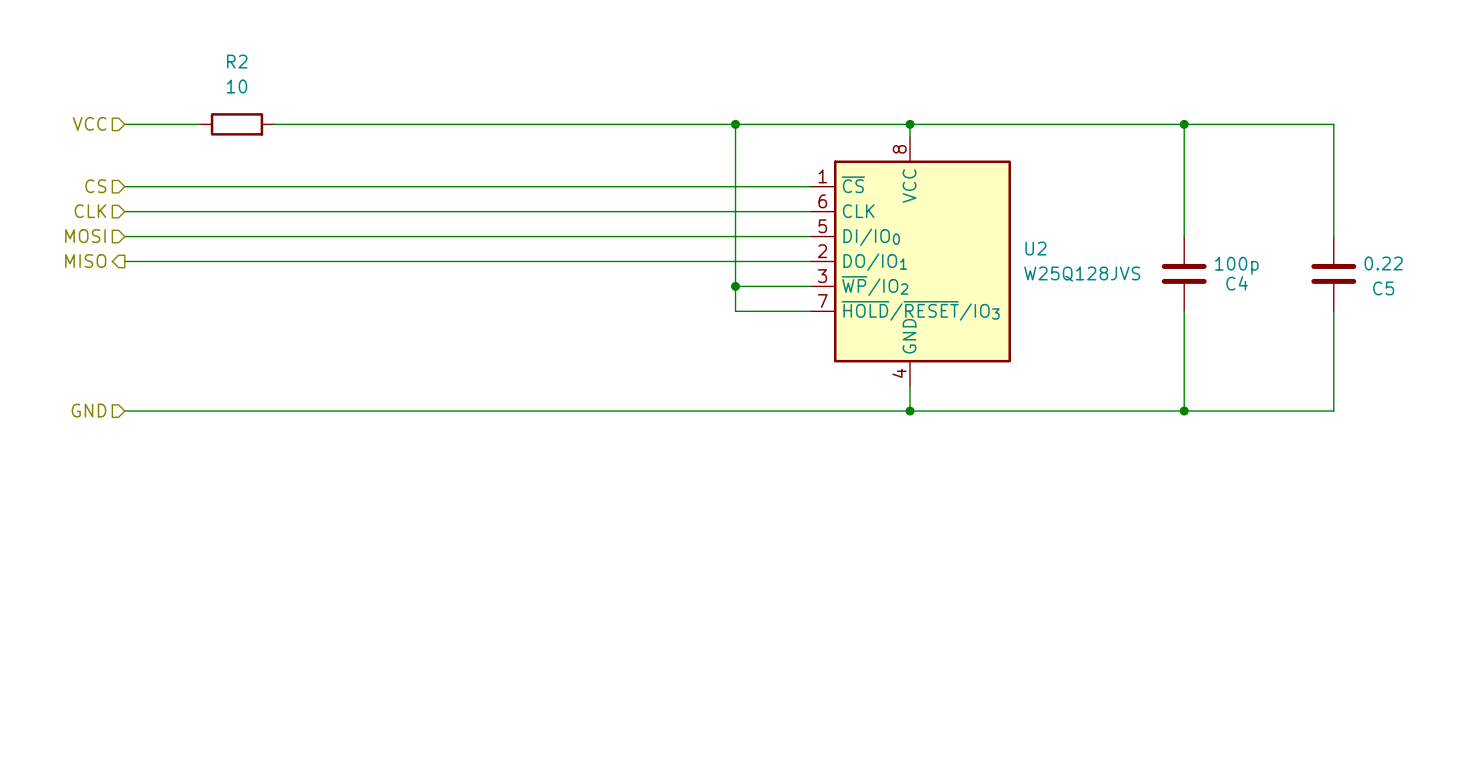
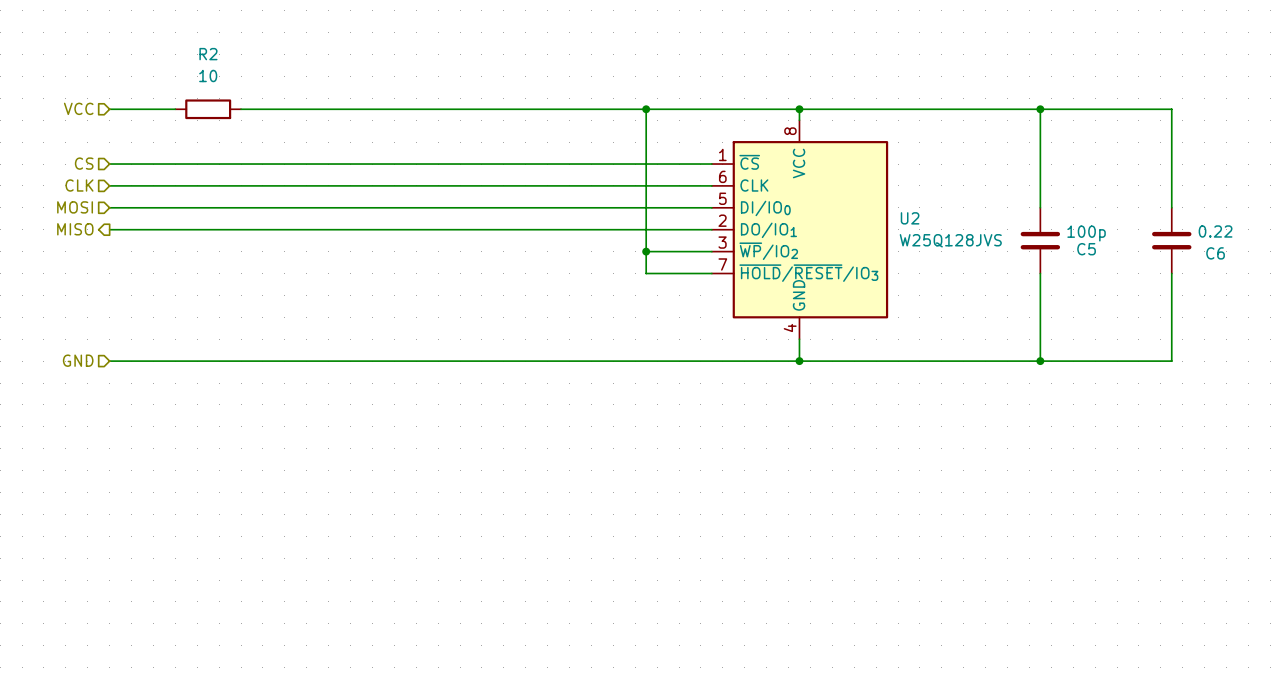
C4 name: C4 (1237, 283) -> C5 (1086, 249)
C5 name: C5 (1383, 288) -> C6 (1215, 253)

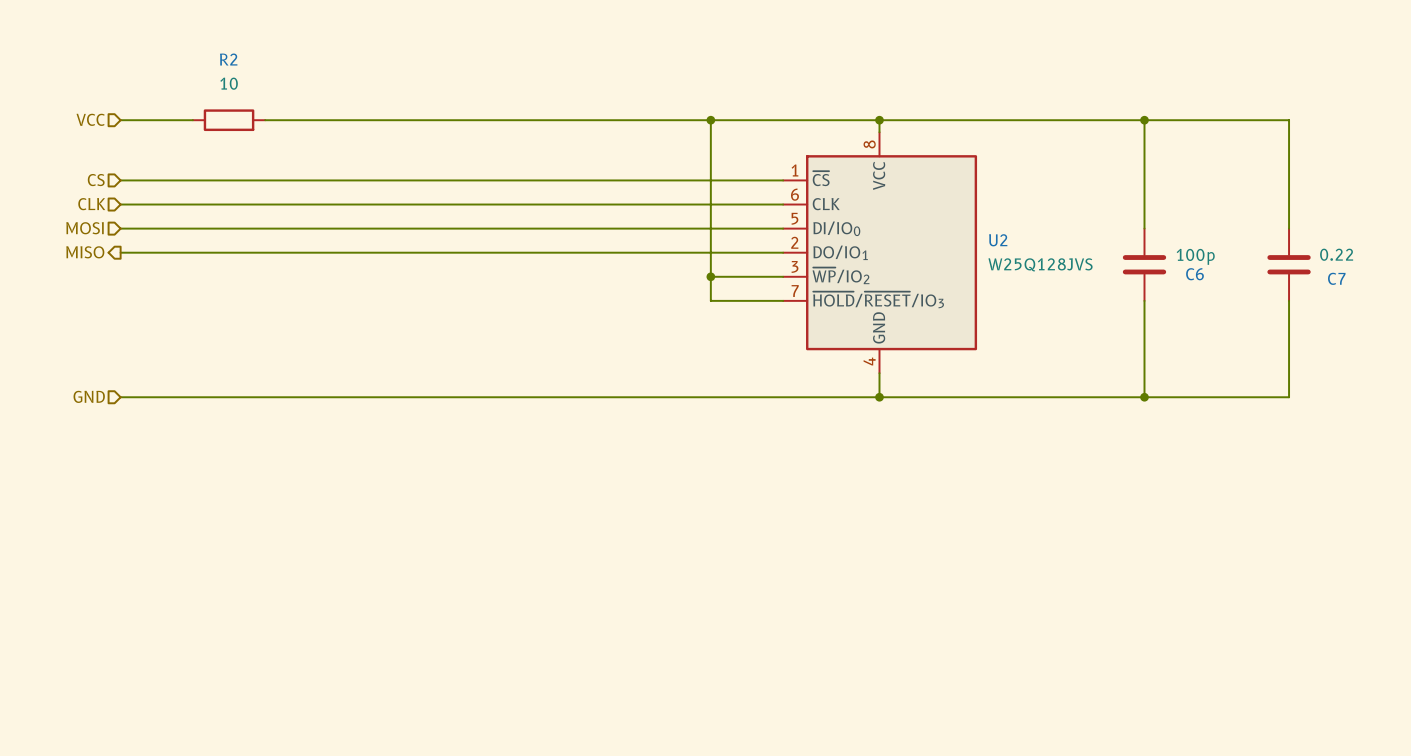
C5 name: C5 (1086, 249) -> C6 (1194, 274)
C6 name: C6 (1215, 253) -> C7 (1336, 278)

